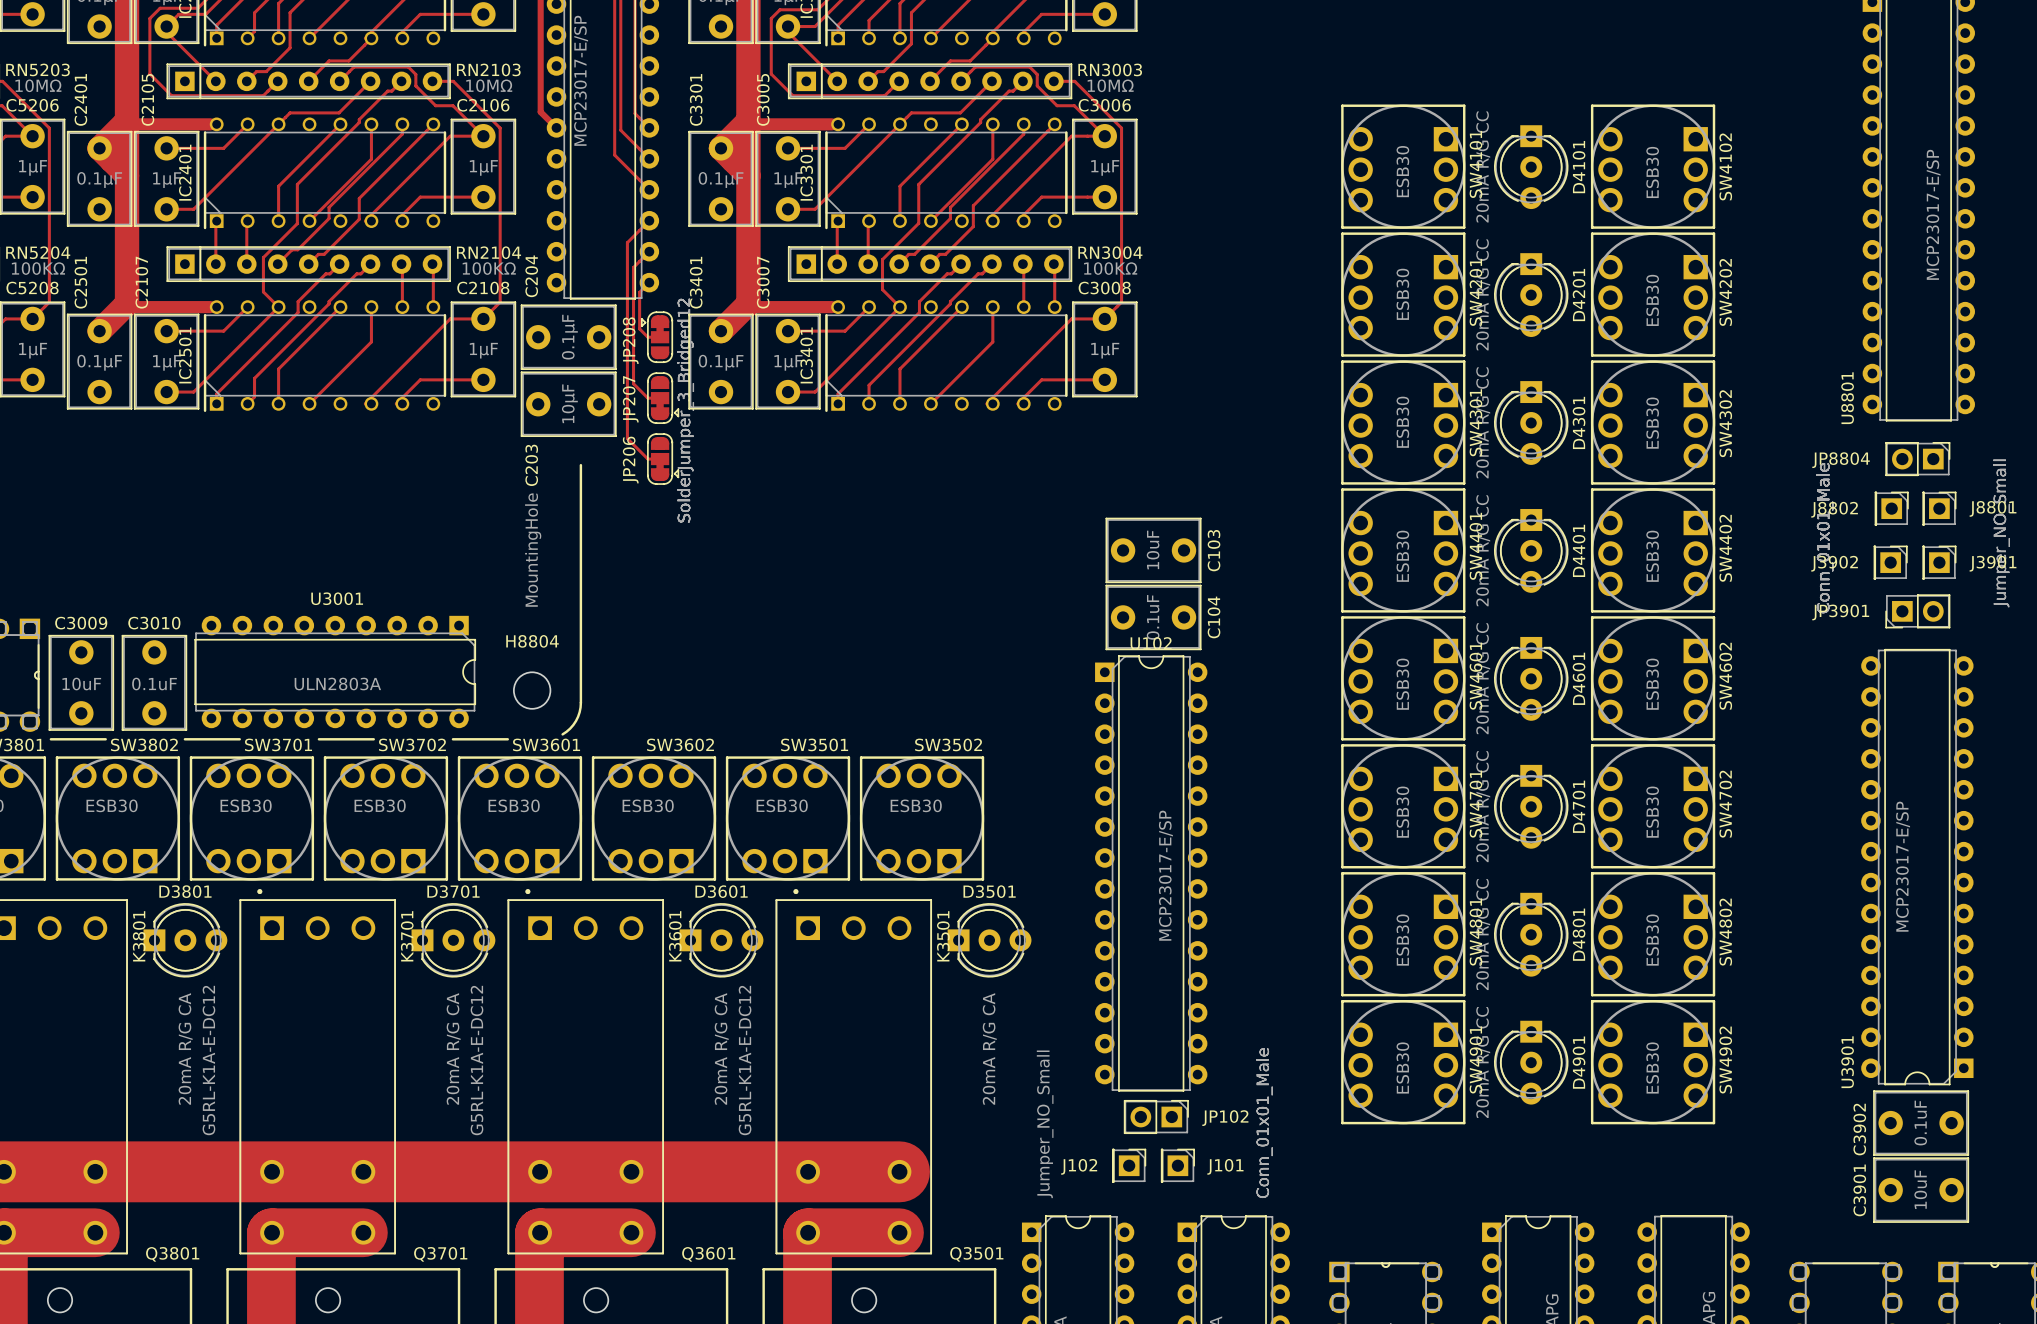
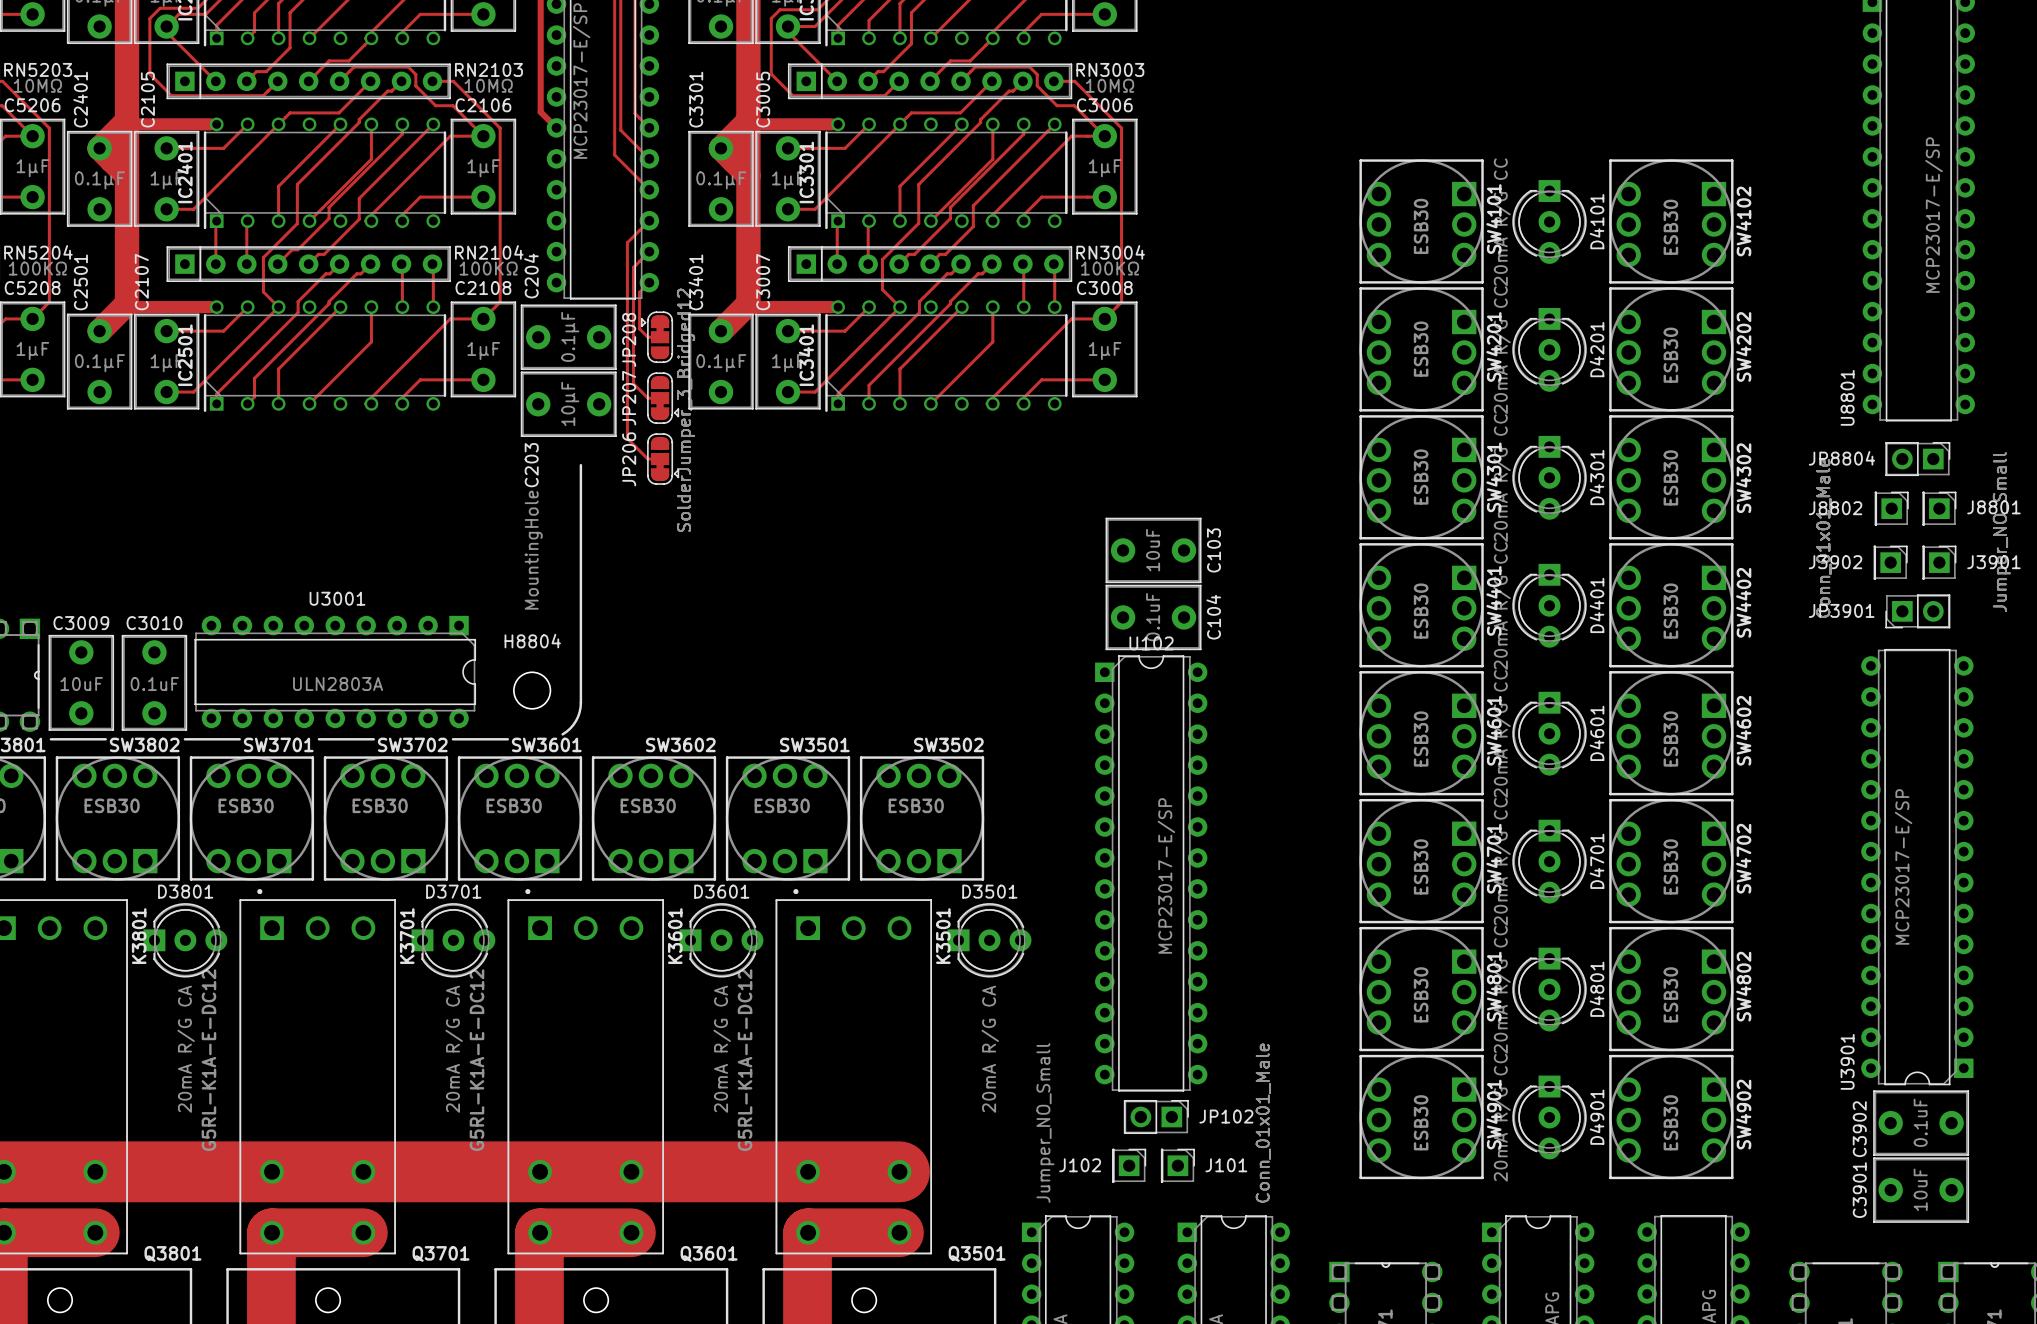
SW4101 position: (1403, 166) -> (1421, 221)
SW4102 position: (1653, 166) -> (1671, 221)
D4101 position: (1531, 167) -> (1549, 221)
SW4201 position: (1403, 294) -> (1421, 349)
SW4202 position: (1653, 294) -> (1671, 349)
D4201 position: (1531, 295) -> (1549, 349)
SW4301 position: (1403, 422) -> (1421, 477)
SW4302 position: (1653, 422) -> (1671, 477)
D4301 position: (1531, 423) -> (1549, 477)
SW4401 position: (1403, 550) -> (1421, 605)
D4401 position: (1531, 550) -> (1549, 605)
SW4402 position: (1653, 550) -> (1671, 605)
SW4601 position: (1403, 678) -> (1421, 733)
D4601 position: (1531, 678) -> (1549, 733)
SW4602 position: (1653, 678) -> (1671, 733)
SW4701 position: (1403, 806) -> (1421, 861)
D4701 position: (1531, 806) -> (1549, 861)
SW4702 position: (1653, 806) -> (1671, 861)
SW4801 position: (1403, 934) -> (1421, 989)
D4801 position: (1531, 934) -> (1549, 989)
SW4802 position: (1653, 934) -> (1671, 989)
SW4901 position: (1403, 1062) -> (1421, 1117)
D4901 position: (1531, 1062) -> (1549, 1117)
SW4902 position: (1653, 1062) -> (1671, 1117)

